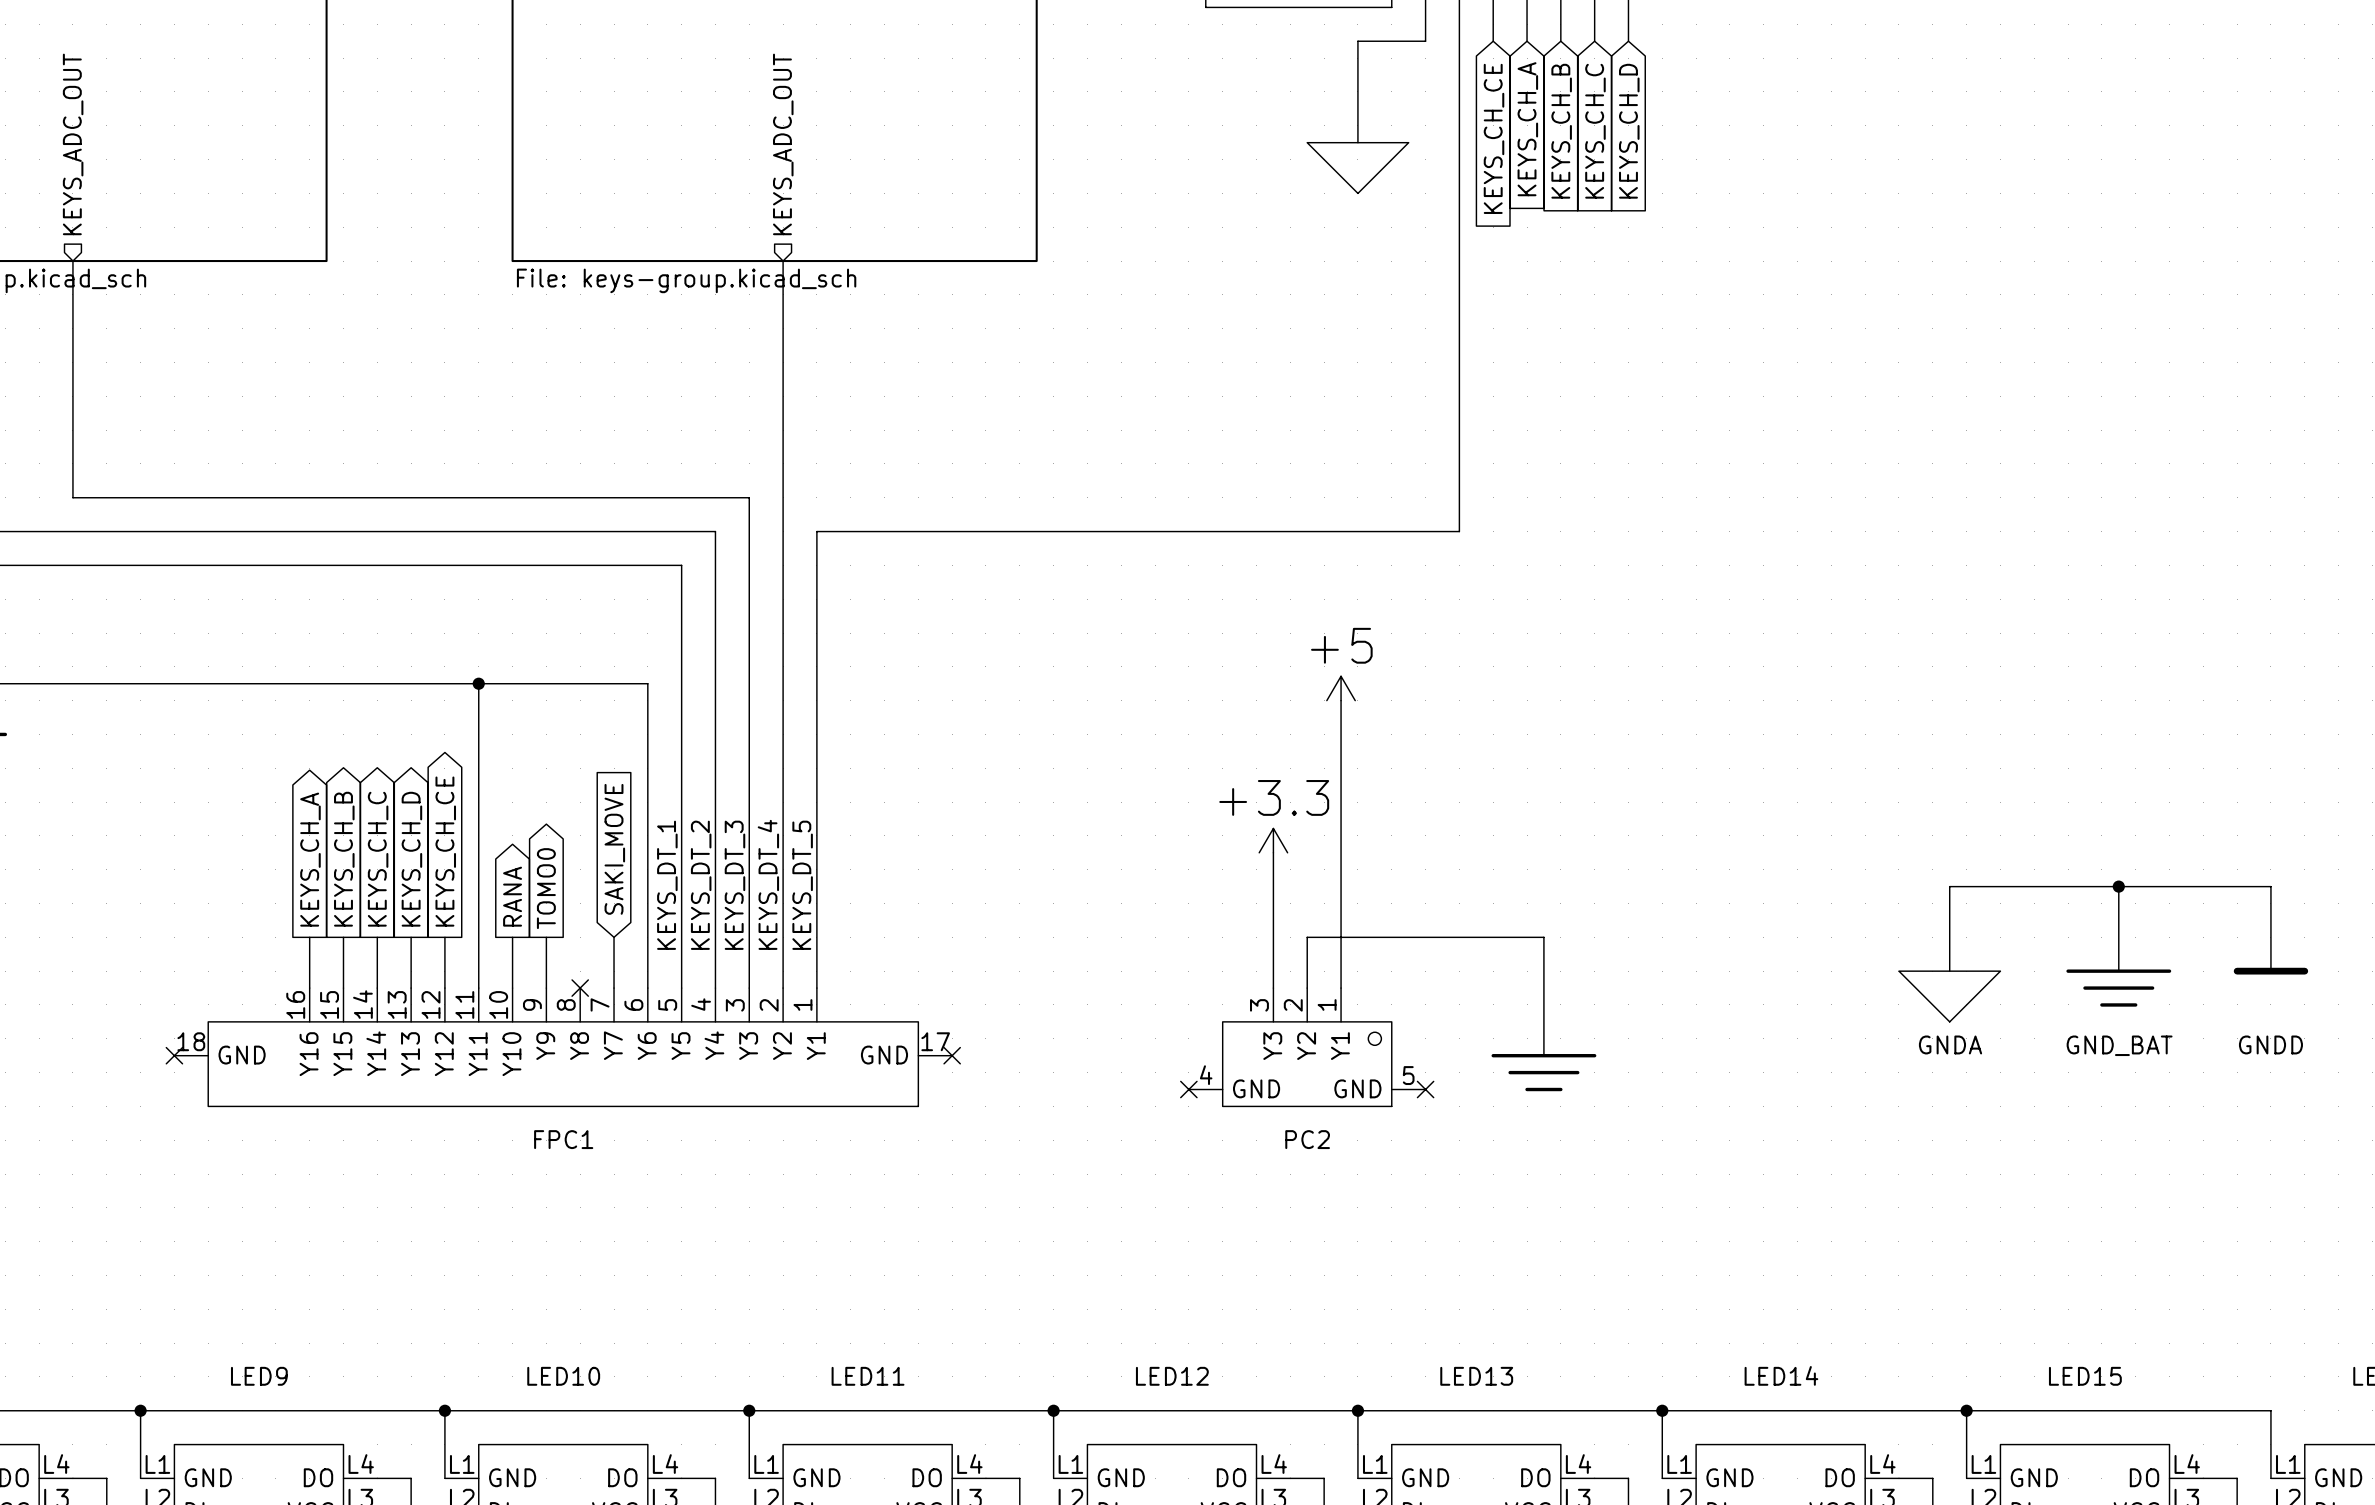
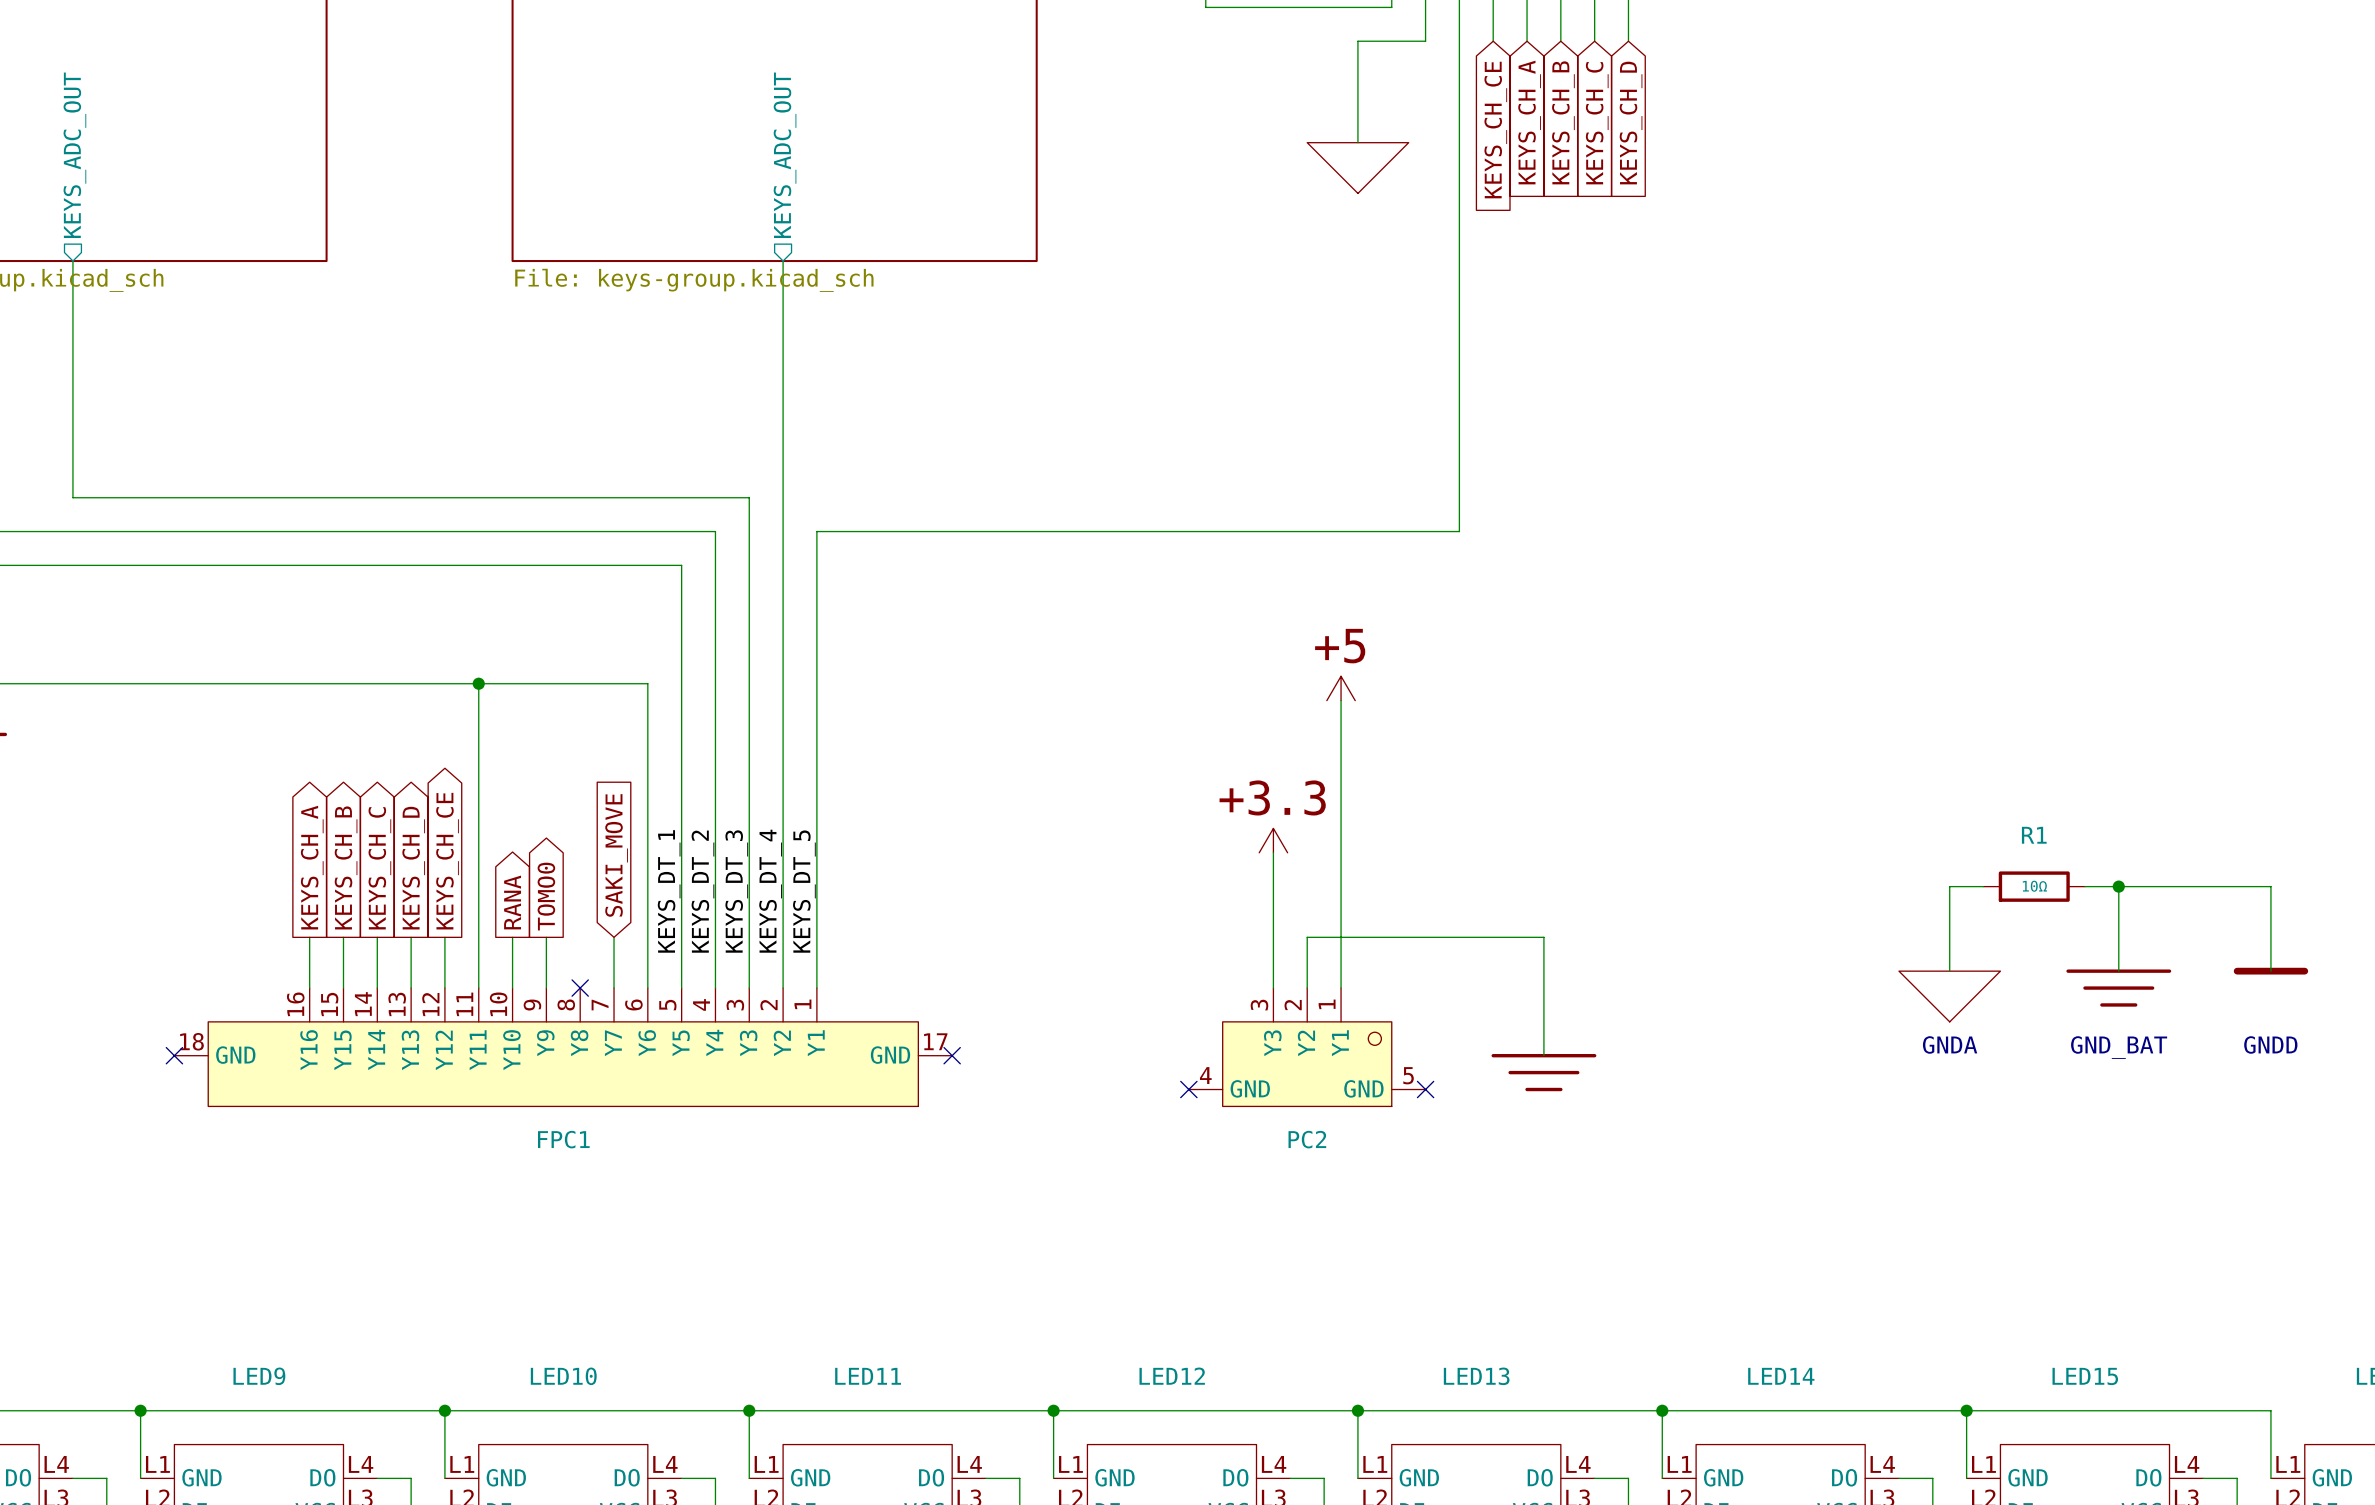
wire: (1983, 886) (2084, 886) -> none
R1: none -> 10Ω (2034, 886)

